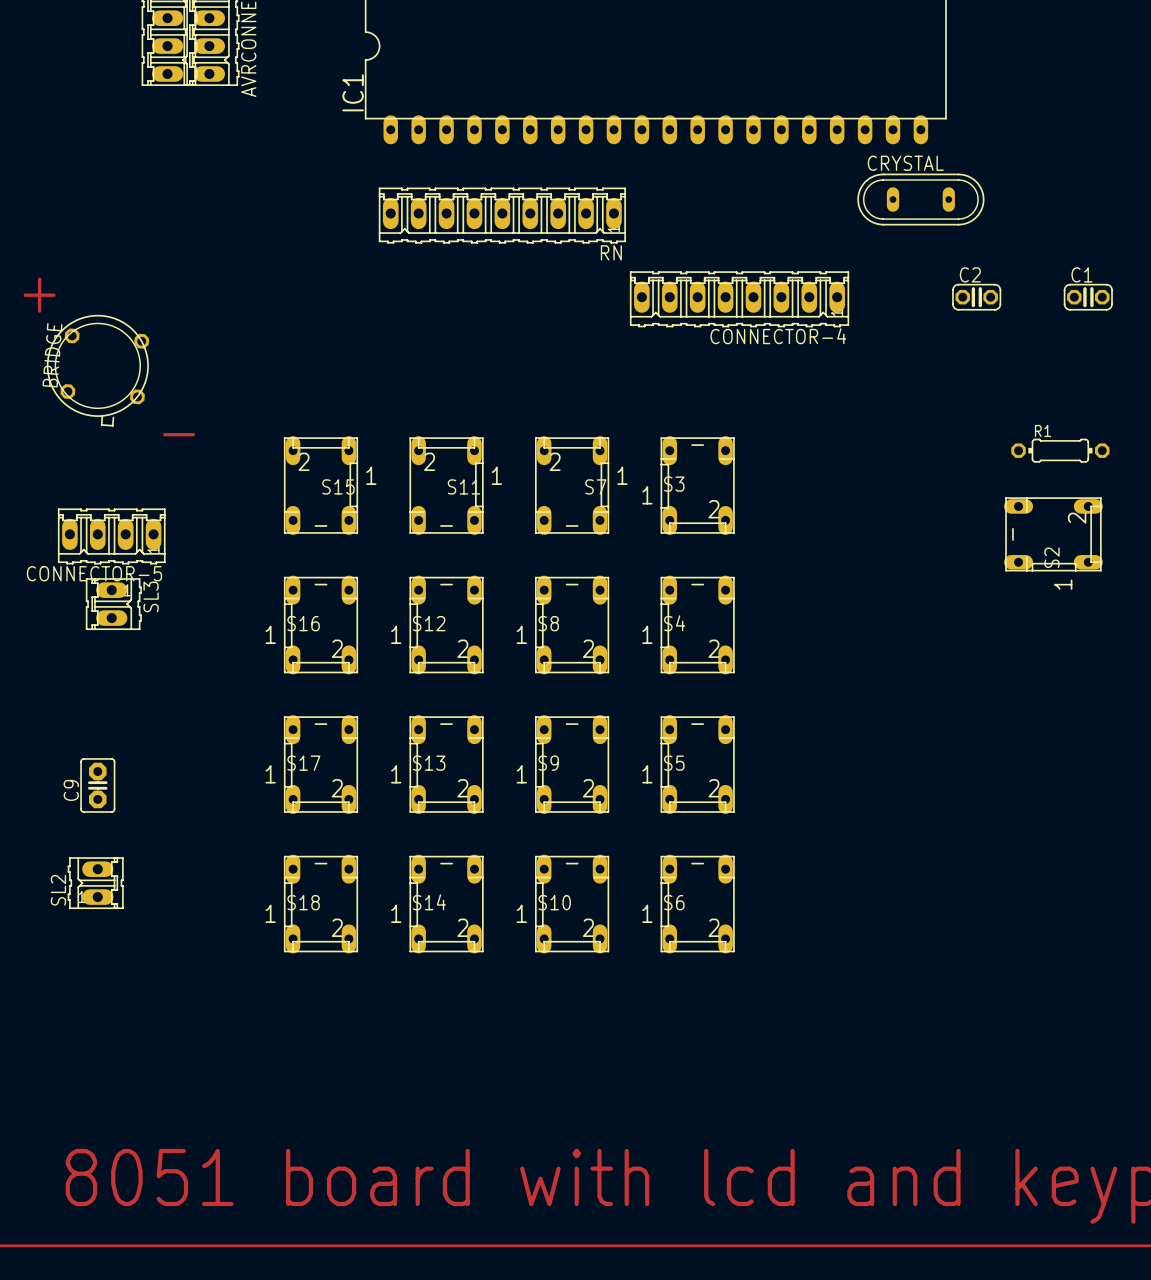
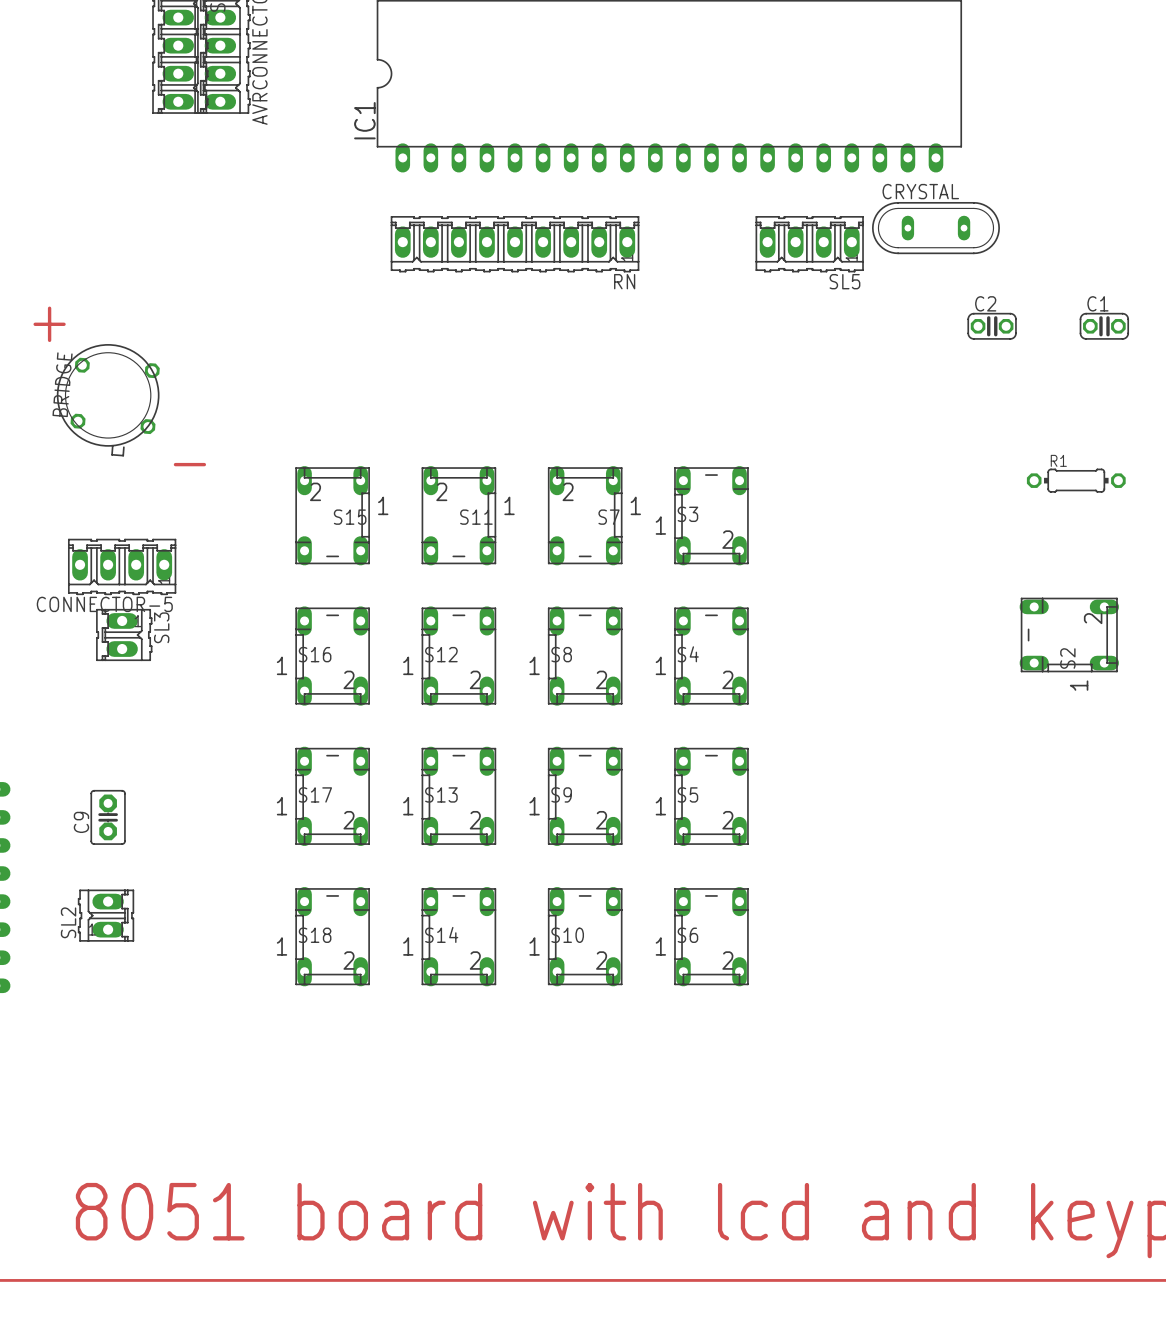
SL5: none -> (809, 244)
CONNECTOR-4: (739, 299) -> none
S2 position: (1053, 534) -> (1069, 634)

